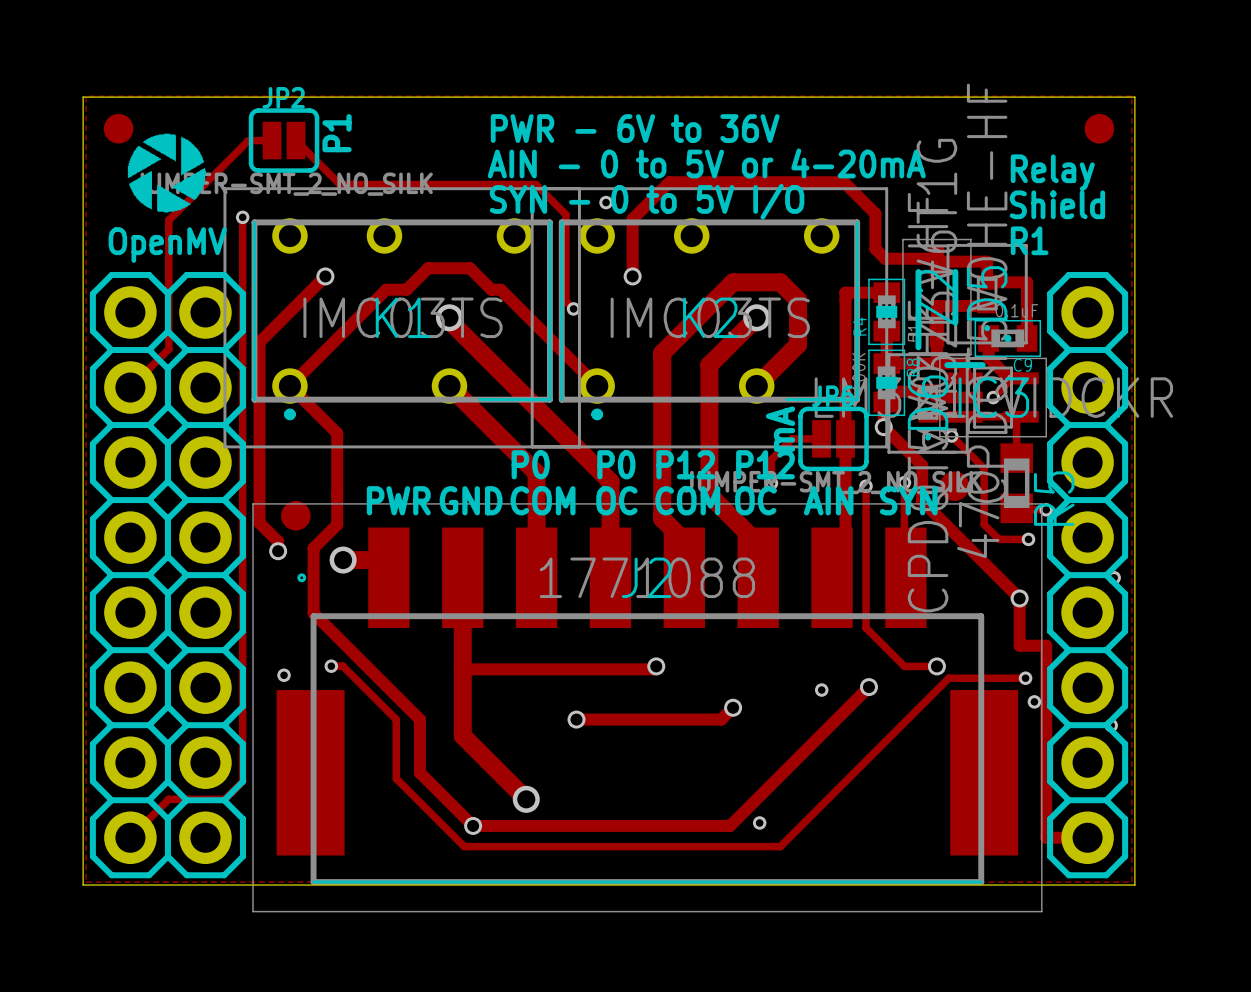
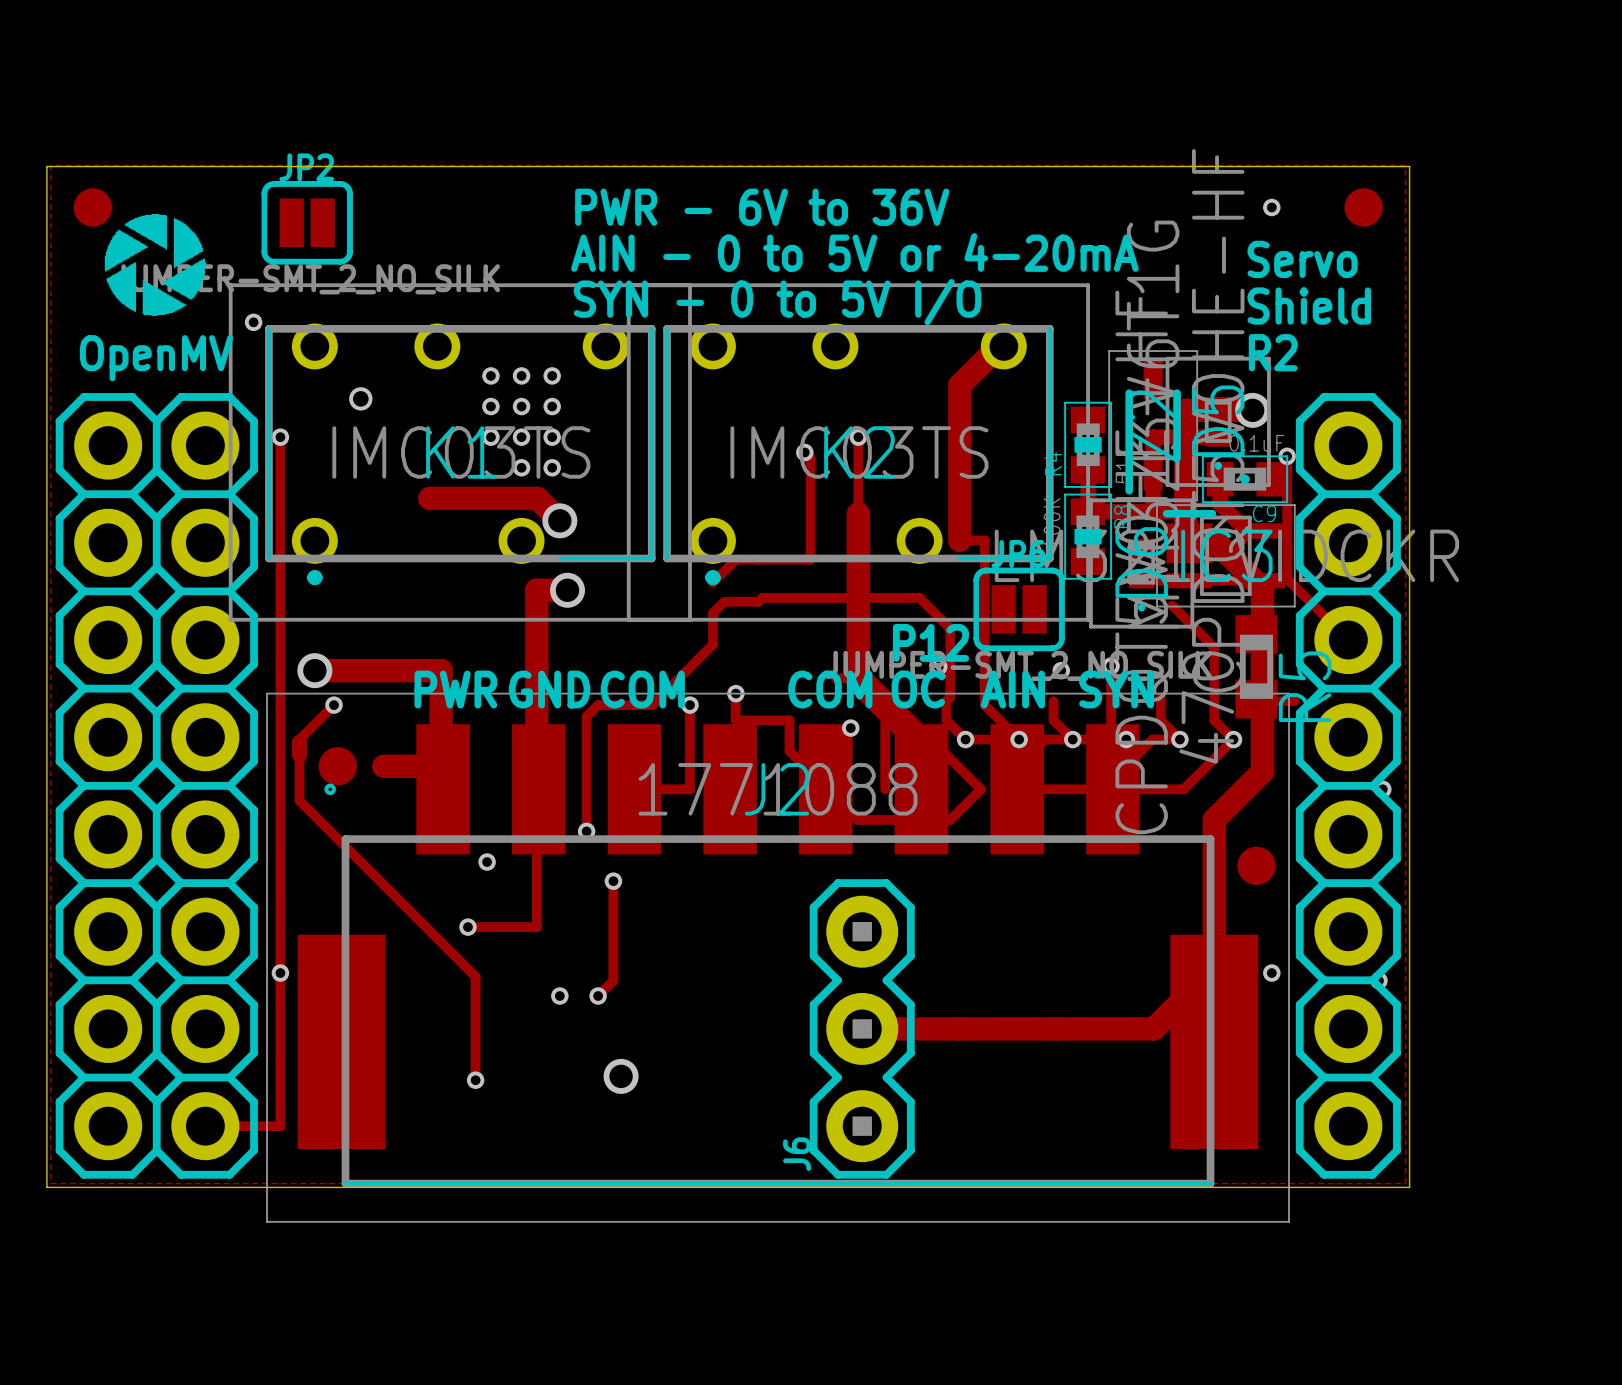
via: none -> (1271, 207)
text: P1 (337, 133) -> none
track: (272, 140) (248, 140) (168, 220) (168, 349) (130, 387) -> none
track: (296, 140) (339, 184) (535, 184) (565, 214) (565, 301) (573, 308) -> none
text: Relay (1052, 172) -> Servo (1302, 259)
via: (606, 202) -> none
track: (242, 217) (242, 781) (224, 799) (168, 799) (130, 837) -> none
track: none -> (1003, 341) (959, 385) (959, 540) (984, 540) (984, 705) (1019, 739)
text: R1 (1029, 240) -> R2 (1273, 352)
via: none -> (490, 375)
via: none -> (521, 375)
via: none -> (552, 375)
track: (325, 276) (259, 342) (259, 522) (278, 541) -> (334, 705) (299, 739) (299, 742)
track: (632, 276) (632, 219) (669, 182) (843, 182) (875, 213) (875, 248) (885, 258) (987, 261) (987, 282) (1027, 282) (1027, 338) -> none
via: (632, 276) -> none
via: none -> (490, 406)
via: none -> (521, 406)
via: none -> (552, 406)
track: none -> (1252, 410) (1185, 410) (1185, 540) (1214, 540) (1262, 588) (1262, 771) (1214, 819) (1214, 968) (1153, 1028) (862, 1028)
via: none -> (1252, 410)
track: (886, 292) (845, 292) (845, 577) -> none
track: none -> (280, 437) (280, 1126) (205, 1126)
via: none -> (280, 437)
via: none -> (490, 437)
via: none -> (521, 437)
via: none -> (552, 437)
via: none -> (858, 437)
via: (573, 308) -> none
track: (449, 317) (449, 320) (610, 481) (610, 577) -> none
via: (449, 317) -> none
track: none -> (804, 452) (810, 458) (810, 559) (735, 559) (712, 582)
via: none -> (804, 452)
track: (756, 317) (709, 365) -> (858, 437) (858, 513)
via: (756, 317) -> none
track: none -> (1287, 456) (1287, 578) (1348, 640)
via: none -> (1287, 456)
via: none -> (521, 467)
via: none -> (552, 467)
track: none -> (429, 498) (537, 498) (559, 520)
via: none -> (559, 520)
track: (449, 386) (536, 473) (536, 577) -> none
track: (597, 386) (500, 289) (491, 289) (469, 268) (428, 268) (406, 289) (386, 289) (289, 386) (337, 433) (337, 524) (313, 548) (313, 613) (419, 719) (419, 772) (473, 825) (730, 825) (868, 687) -> none
track: (756, 386) (798, 344) (798, 300) (780, 282) (733, 282) (662, 353) (662, 518) (684, 540) (684, 577) -> none
track: (964, 397) (933, 397) (928, 391) (897, 391) (886, 402) (883, 402) (883, 427) (922, 465) (922, 500) (1019, 598) (1019, 645) (1046, 645) (1046, 837) (1087, 837) -> none
via: (993, 397) -> none
track: none -> (567, 590) (536, 590) (536, 927) (467, 927)
via: none -> (567, 590)
via: (883, 427) -> none
text: mA (780, 429) -> none
via: (951, 435) -> none
track: (821, 438) (792, 438) (771, 459) (771, 483) -> none
track: none -> (860, 636) (860, 668) (980, 789) (950, 819) (858, 819) (789, 751) (789, 720) (735, 720) (735, 693)
text: P0 (530, 464) -> none
text: P0 (616, 464) -> none
text: P12 (685, 464) -> none
track: none -> (314, 670) (441, 670) (441, 789)
track: (866, 486) (866, 628) (904, 666) (936, 666) -> none
part position: (954, 486) -> (1256, 865)
track: none -> (835, 678) (846, 678) (885, 716) (885, 789)
text: OC (616, 500) -> none
via: none -> (735, 693)
track: none -> (1160, 697) (1160, 720) (1179, 739) (1152, 739) (1134, 758) (1118, 758) (1100, 739) (1045, 739) (1026, 758) (1011, 758) (993, 739) (965, 739) (946, 720) (946, 701) (950, 697) (950, 628) (919, 597) (762, 597) (758, 601) (724, 601) (712, 613) (712, 644) (652, 705) (598, 705) (586, 716) (586, 831)
track: none -> (1053, 701) (1053, 720) (1072, 739)
via: (1046, 509) -> none
via: none -> (334, 705)
track: none -> (689, 705) (689, 789) (632, 789)
via: none -> (689, 705)
part position: (295, 515) -> (337, 766)
via: none -> (850, 728)
via: none -> (965, 739)
via: none -> (1019, 739)
via: none -> (1072, 739)
via: none -> (1126, 739)
via: none -> (1179, 739)
track: (998, 539) (1028, 539) -> (1233, 739) (1183, 789) (1034, 789)
via: none -> (1233, 739)
via: (1028, 539) -> none
track: none -> (299, 754) (299, 800) (475, 976) (475, 1080)
via: (278, 551) -> none
via position: (343, 560) -> (314, 670)
track: (462, 577) (462, 735) (526, 799) -> none
via: (1019, 598) -> none
via: none -> (586, 831)
via: none -> (487, 862)
track: none -> (613, 881) (613, 980) (598, 996)
via: none -> (613, 881)
track: (331, 666) (342, 666) (396, 719) (396, 778) (464, 846) (780, 846) (948, 678) (1025, 678) -> none
via: (331, 666) -> none
track: (656, 666) (653, 669) (462, 669) -> none
via: (656, 666) -> none
via: (936, 666) -> none
via: (284, 675) -> none
via: (1025, 678) -> none
via: none -> (467, 927)
via: (868, 687) -> none
via: (821, 690) -> none
via position: (1034, 701) -> (1271, 973)
track: (733, 707) (721, 719) (576, 719) -> none
via: (733, 707) -> none
via: none -> (280, 973)
via: (576, 719) -> none
via: none -> (559, 996)
via: none -> (598, 996)
J6: none -> (862, 1028)
via: none -> (475, 1080)
via: (759, 822) -> none
via: (473, 825) -> none

